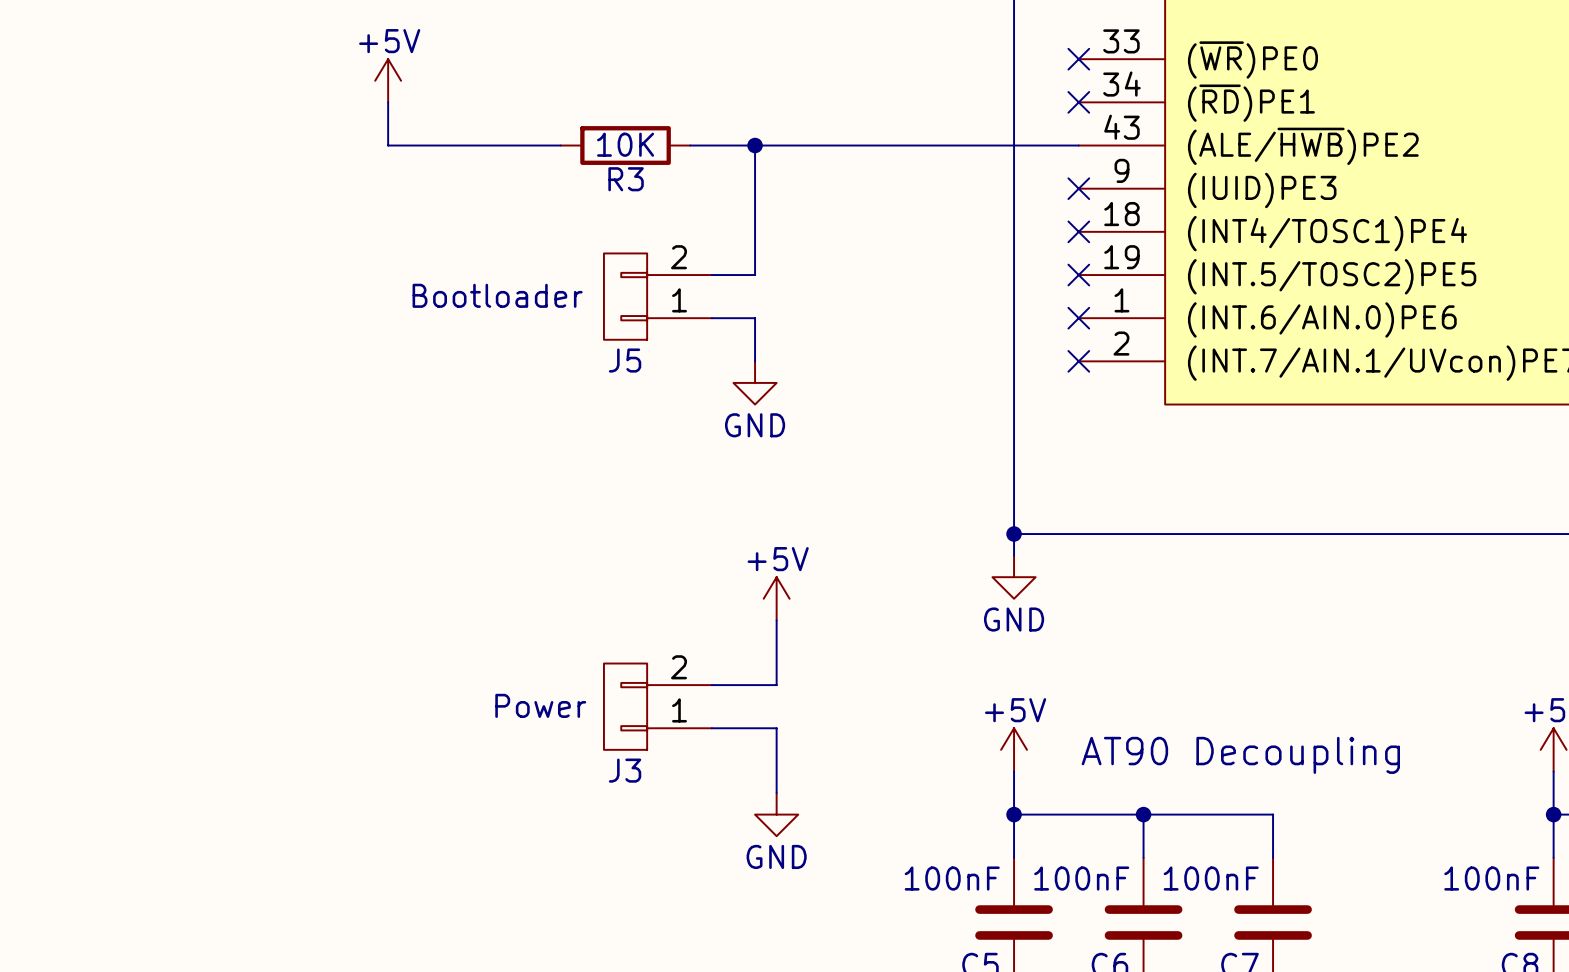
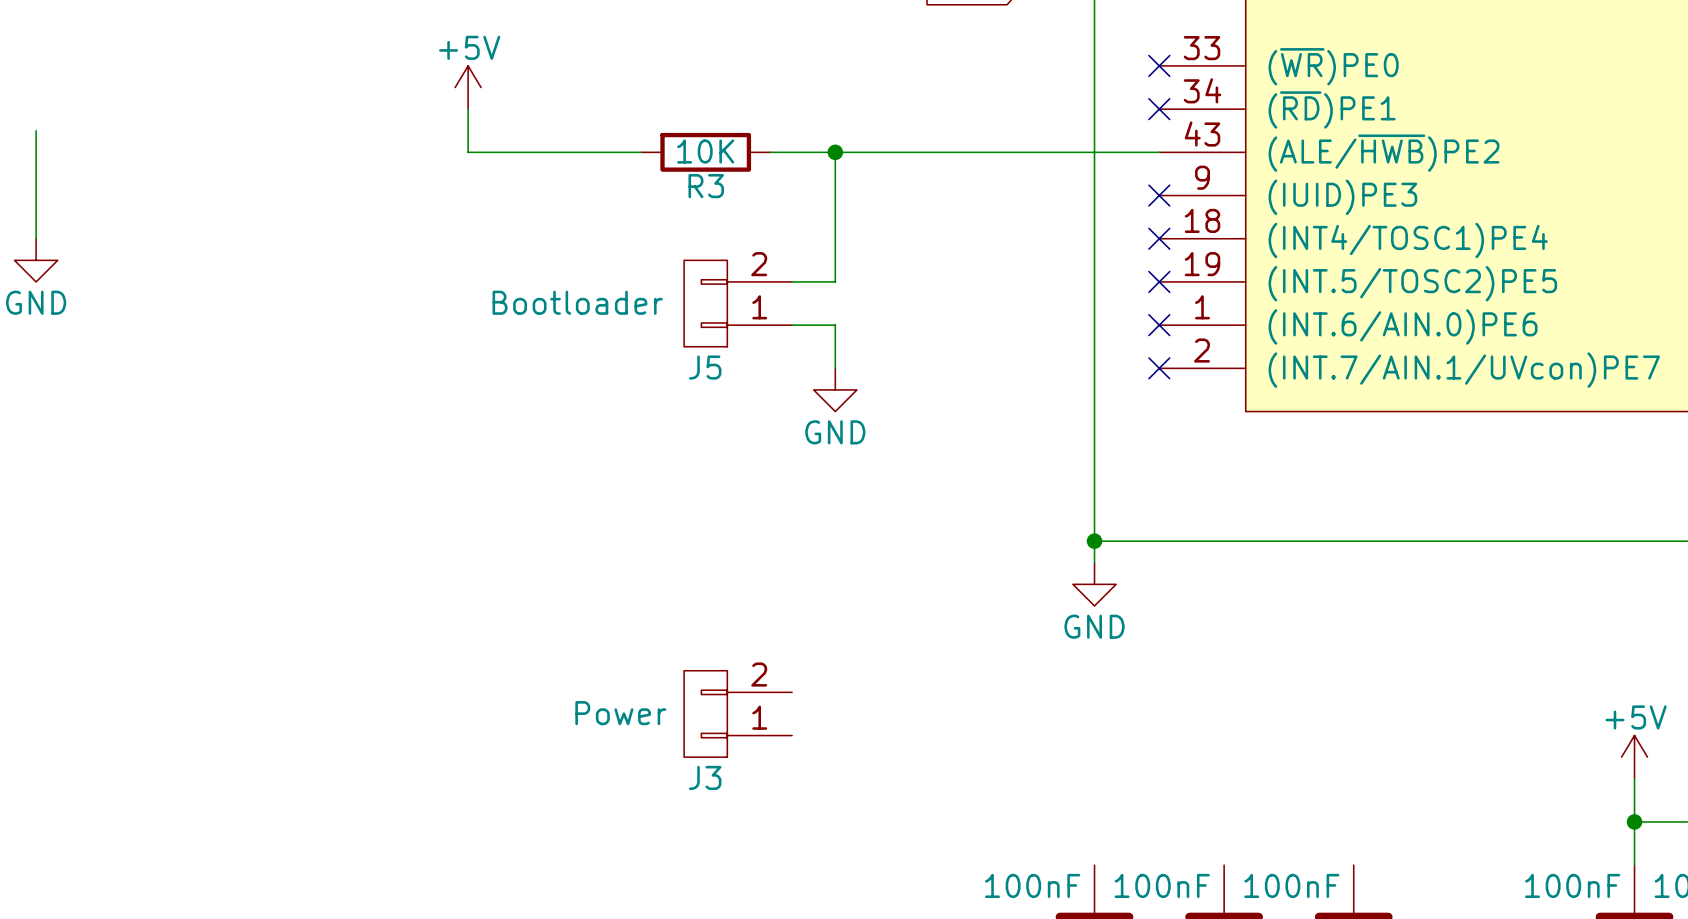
power symbol: +5V (776, 598) -> none
wire: (776, 620) (776, 685) (711, 685) -> none
wire: (711, 728) (776, 728) (776, 793) -> none
power symbol: +5V (1014, 749) -> none
text: AT90 Decoupling (1240, 755) -> none
wire: (1014, 771) (1014, 857) -> none
power symbol: GND (776, 814) -> none
wire: (1014, 814) (1273, 814) (1273, 857) -> none
junction: (1014, 814) -> none
wire: (1143, 814) (1143, 857) -> none
junction: (1143, 814) -> none

